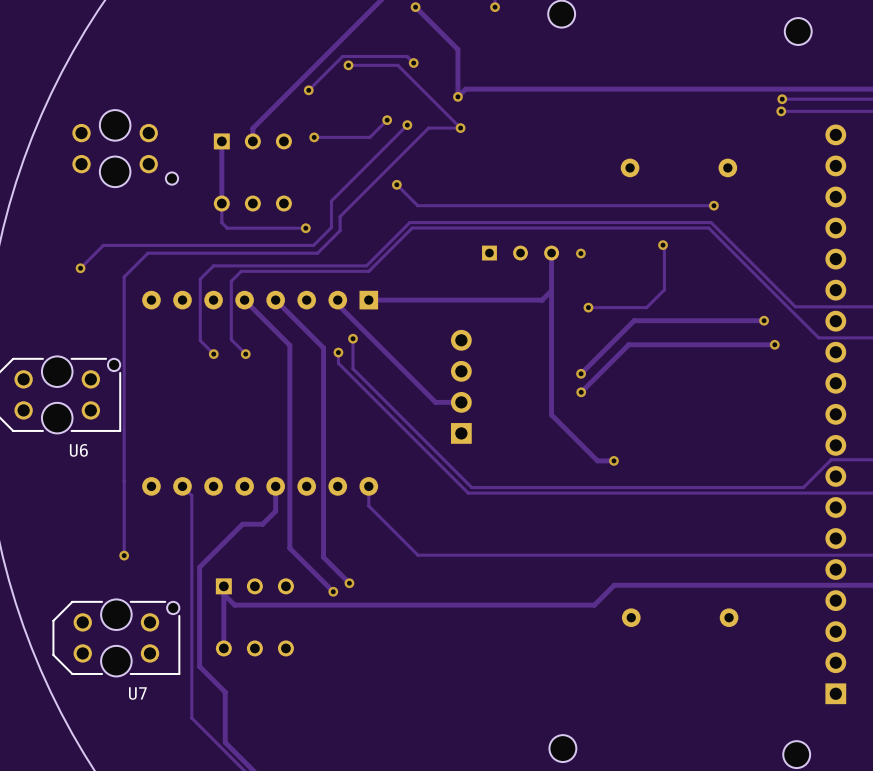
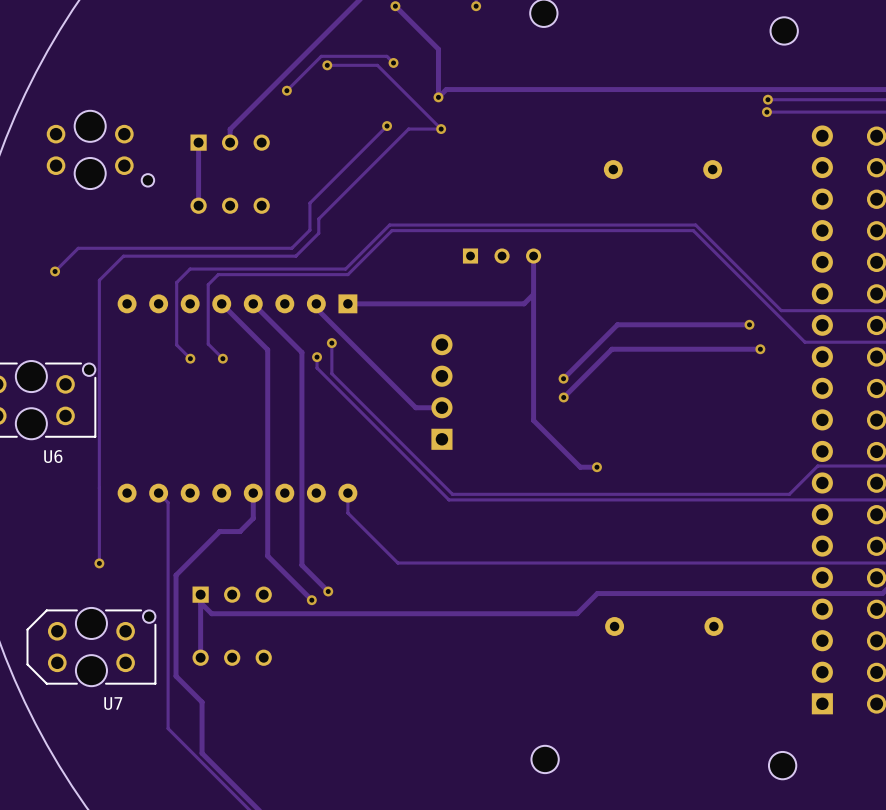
track: (387, 120) (369, 137) (314, 137) -> none
via: (387, 120) -> none
via: (314, 137) -> none
track: (396, 184) (417, 205) (713, 205) -> none
via: (396, 184) -> none
track: (221, 203) (221, 222) (227, 228) (305, 228) -> none
via: (713, 205) -> none
via: (305, 228) -> none
track: (663, 245) (664, 289) (646, 307) (588, 307) -> none
via: (663, 245) -> none
via: (580, 253) -> none
via: (588, 307) -> none

